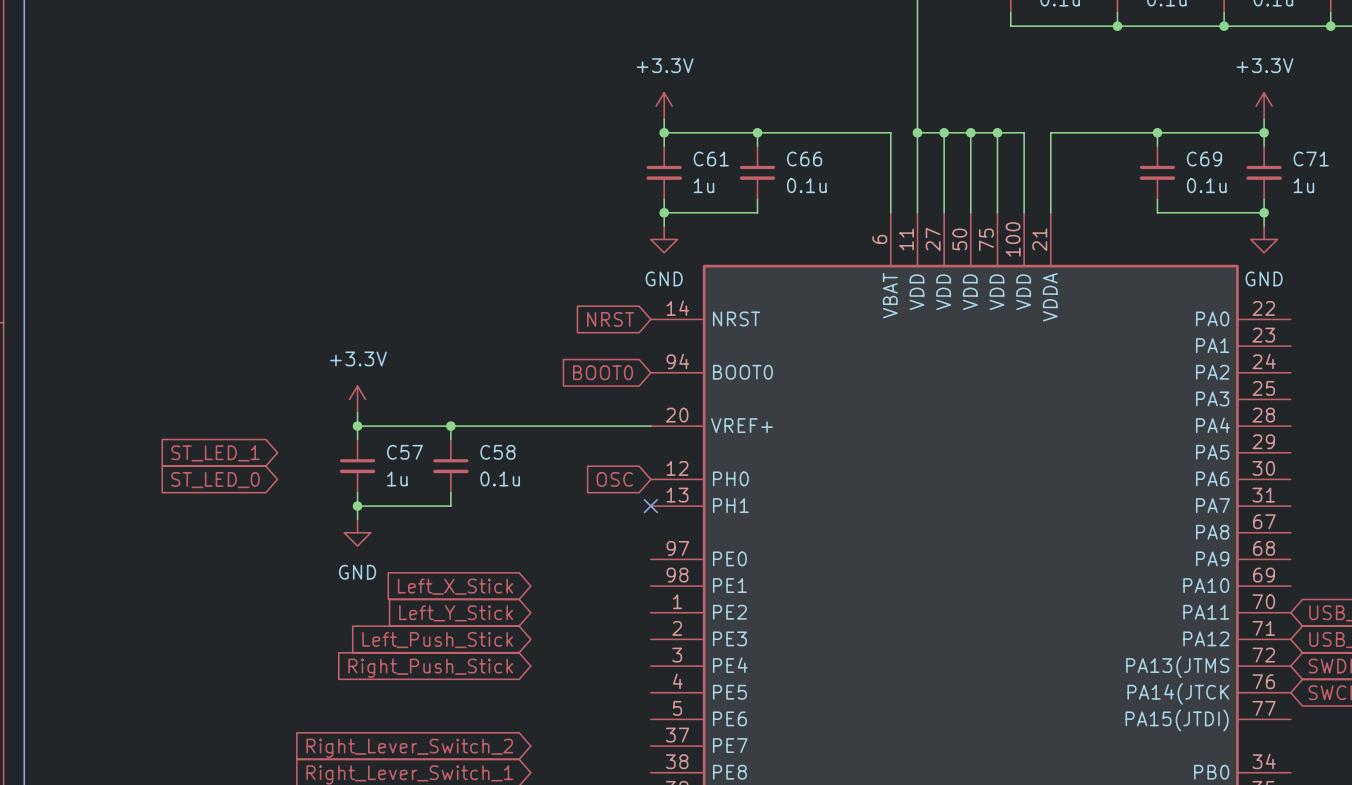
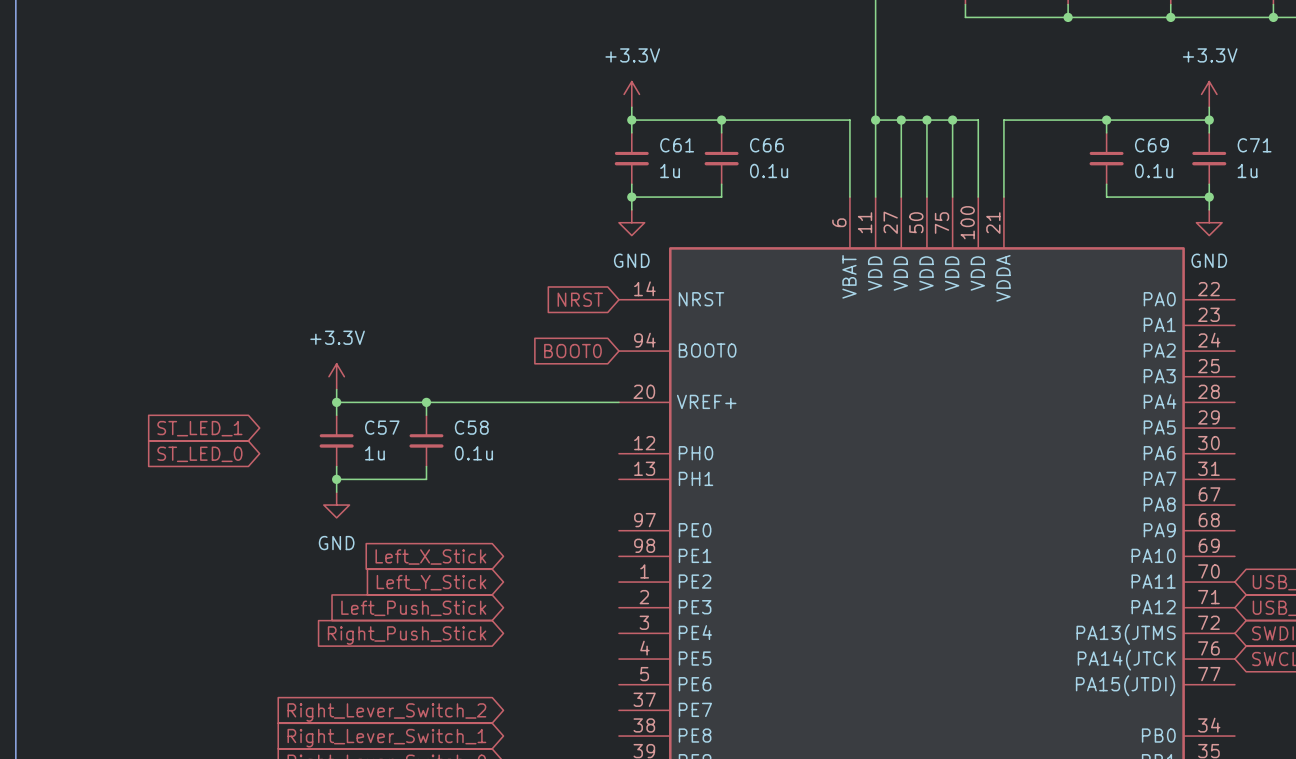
global label: OSC (614, 479) -> none
no-connect mark: (650, 506) -> none

